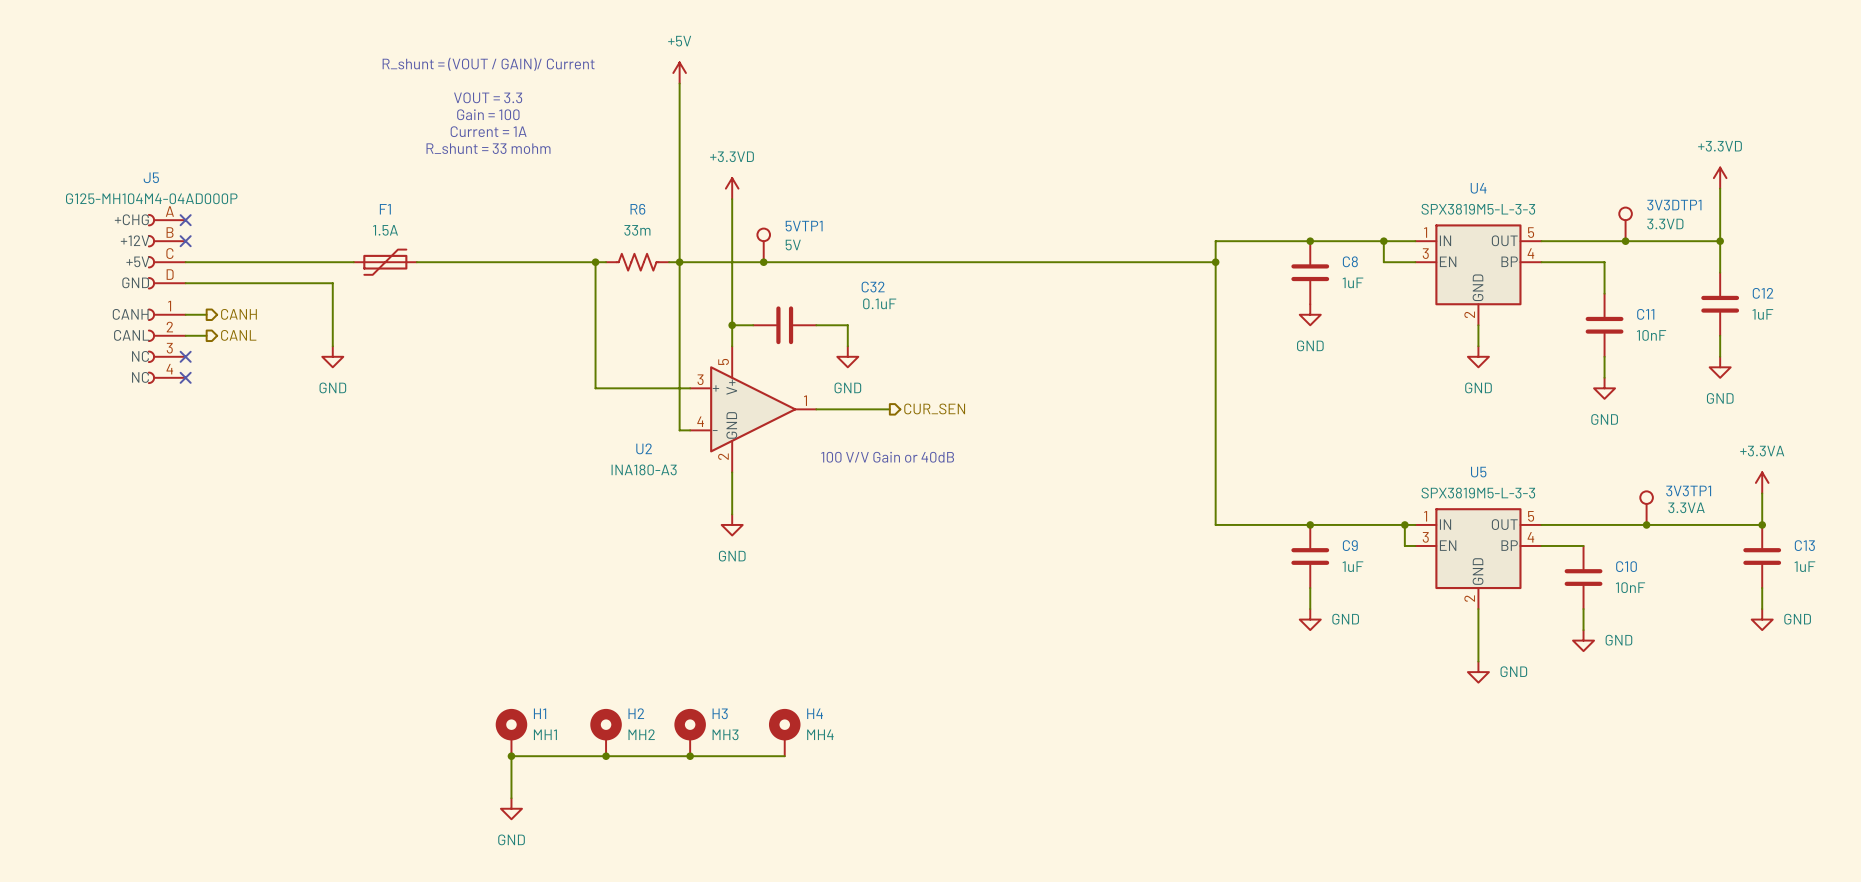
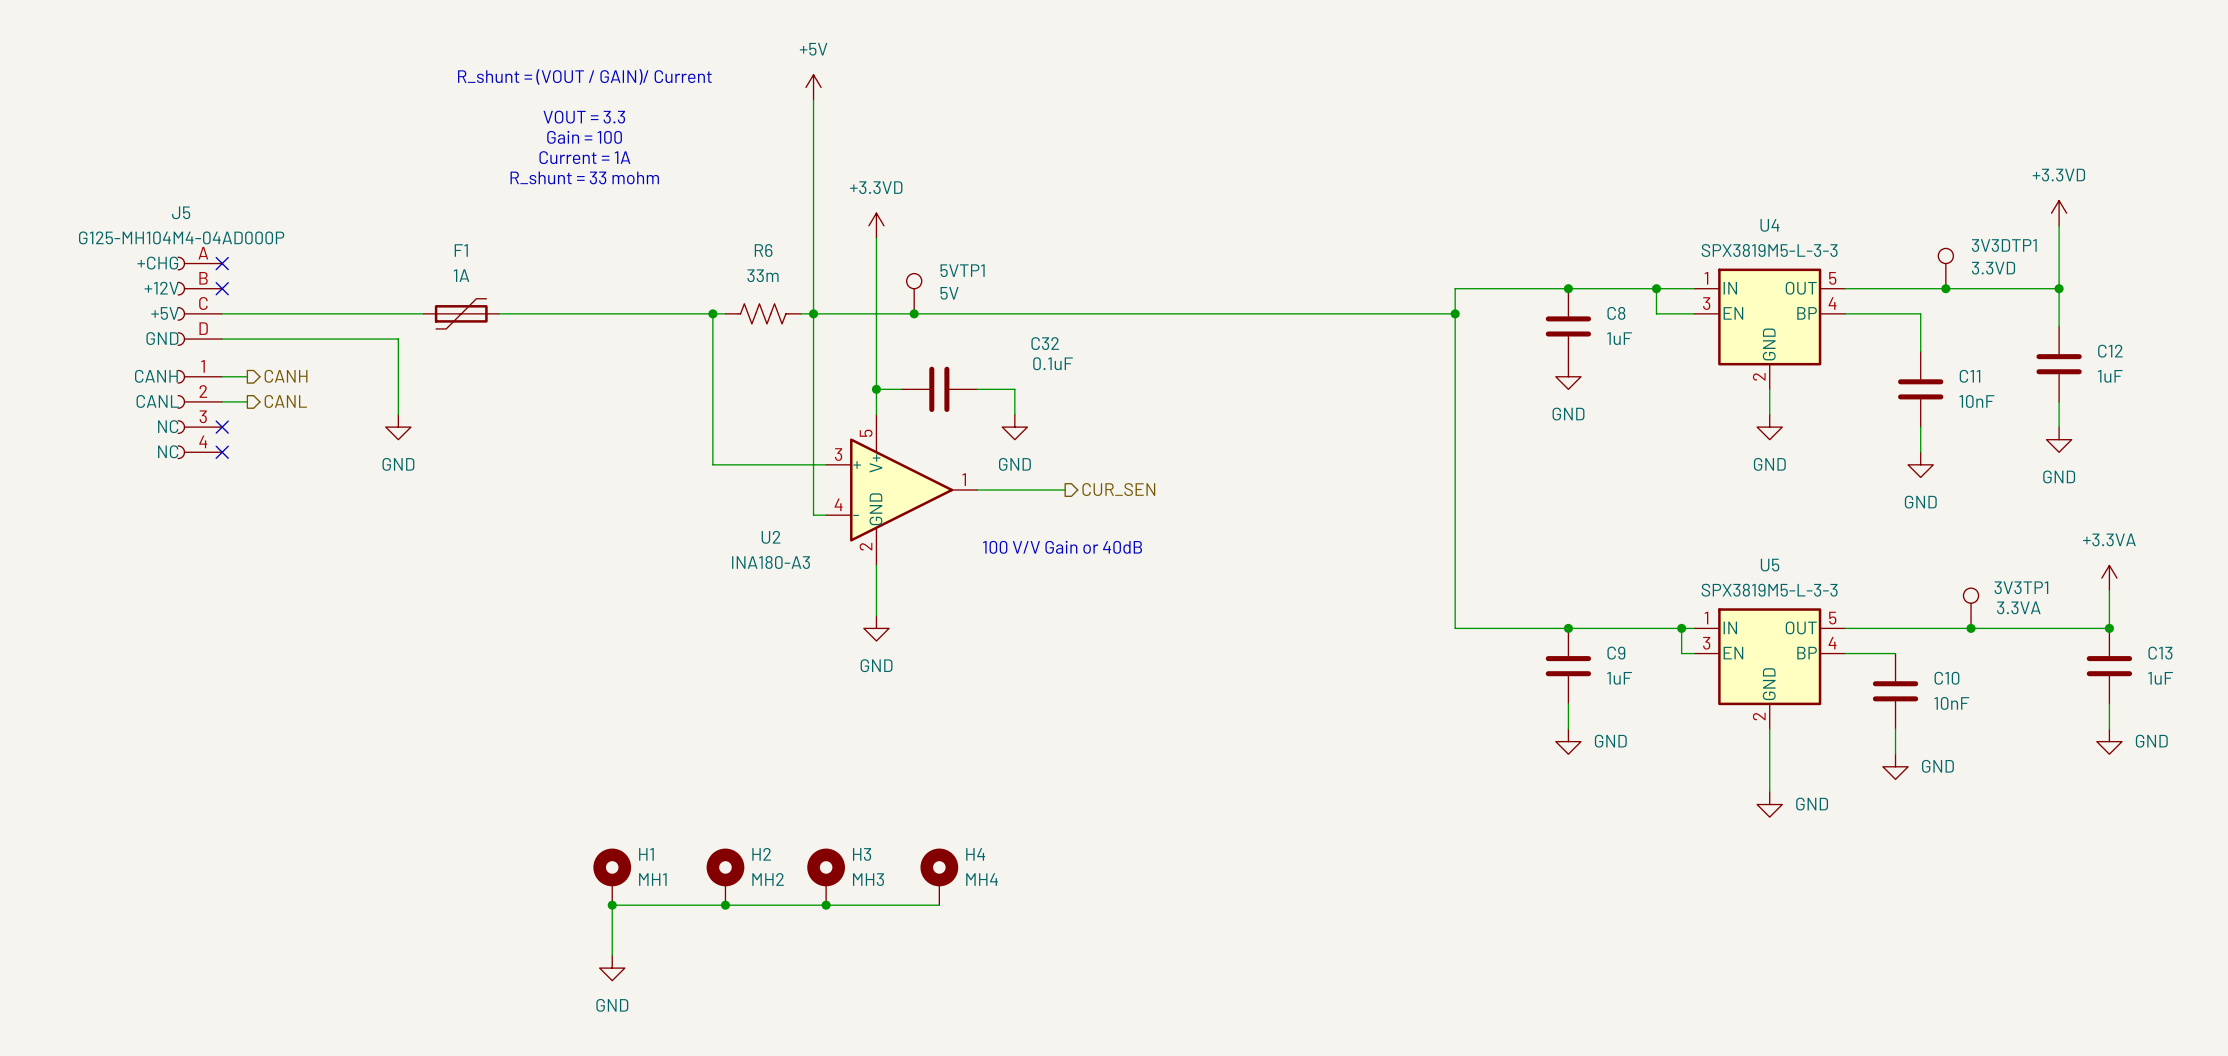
F1 value: 1.5A (385, 230) -> 1A (461, 275)

